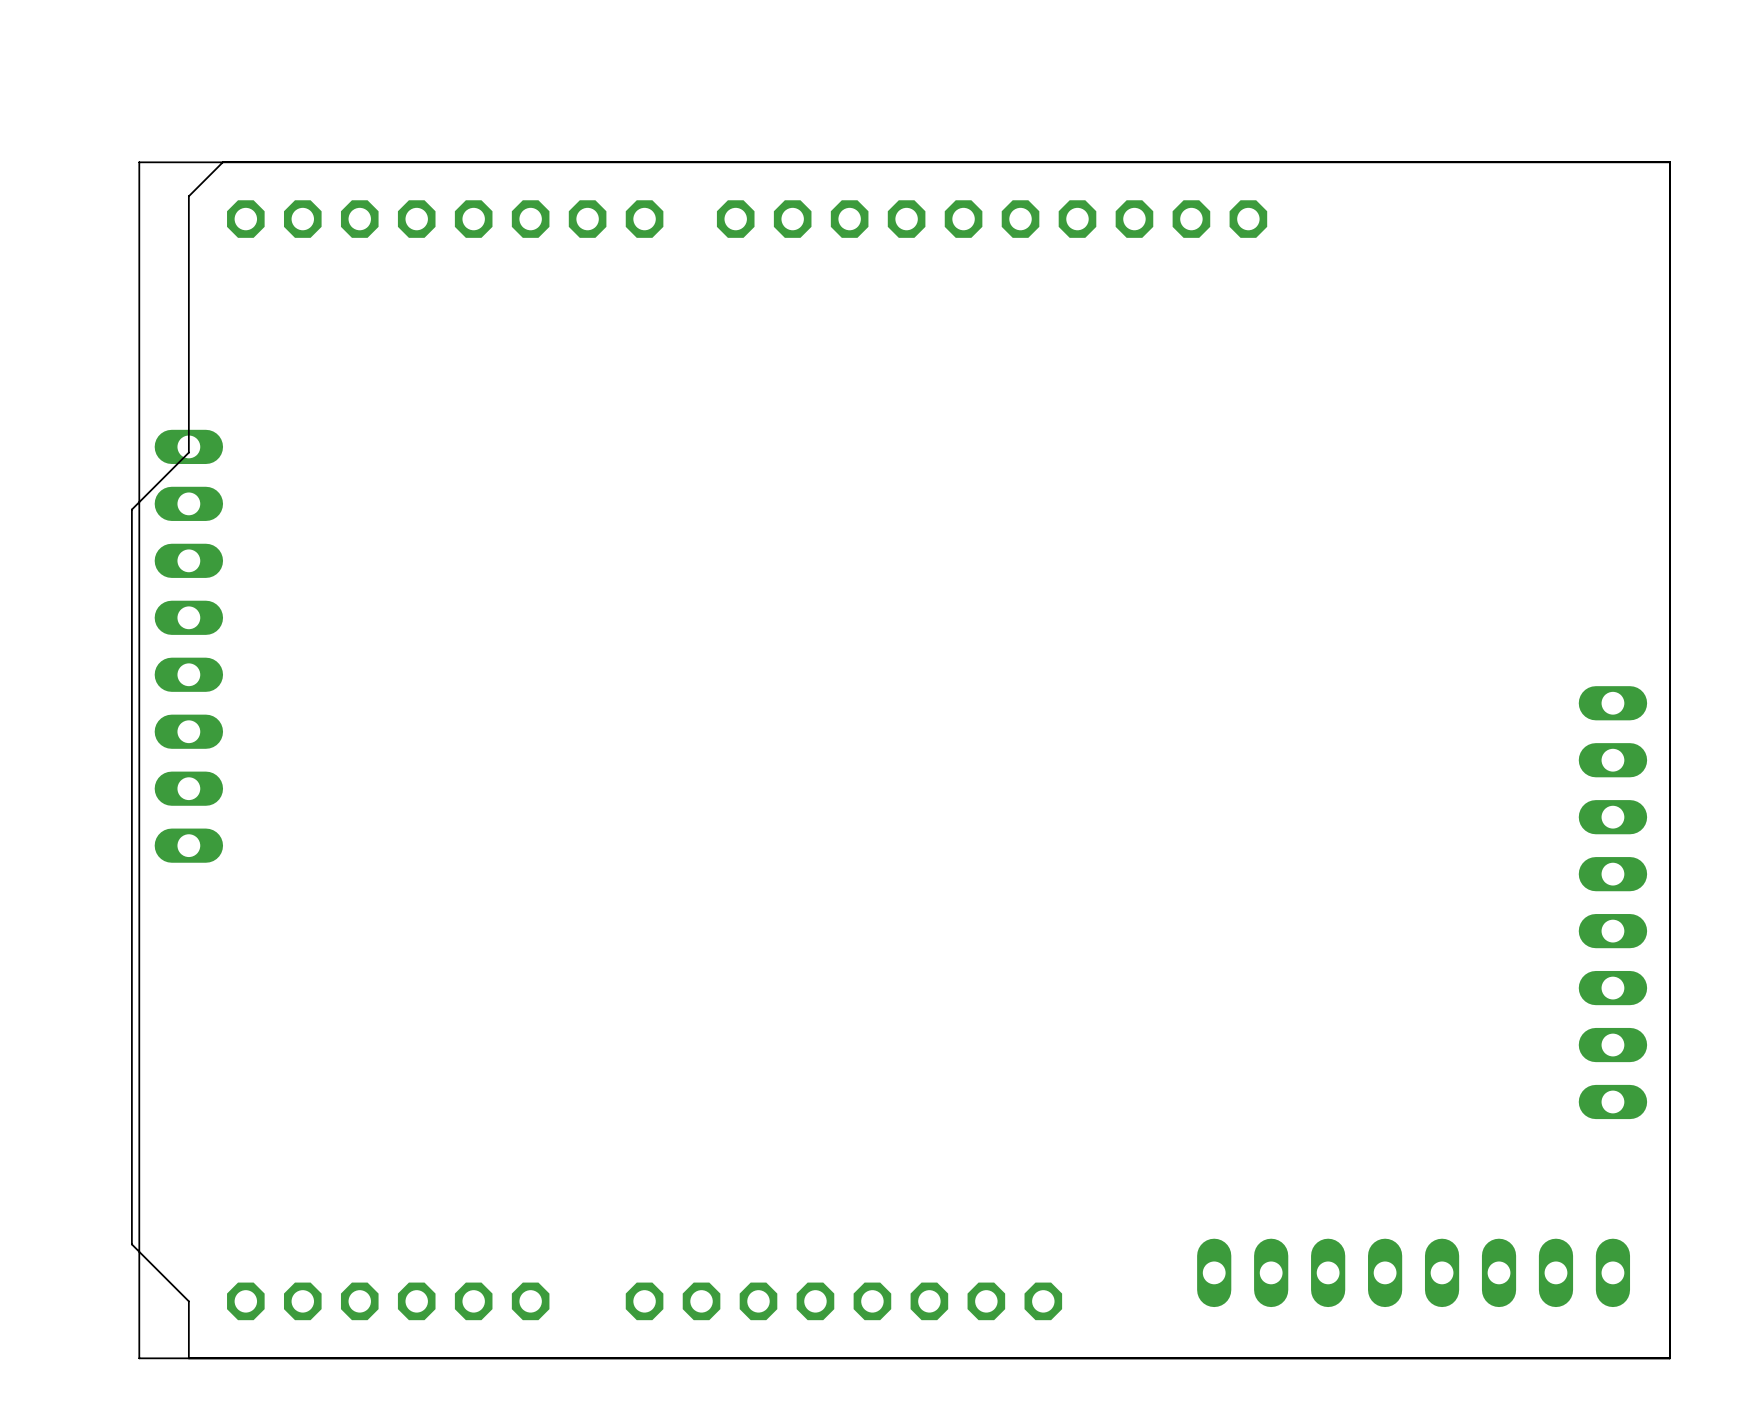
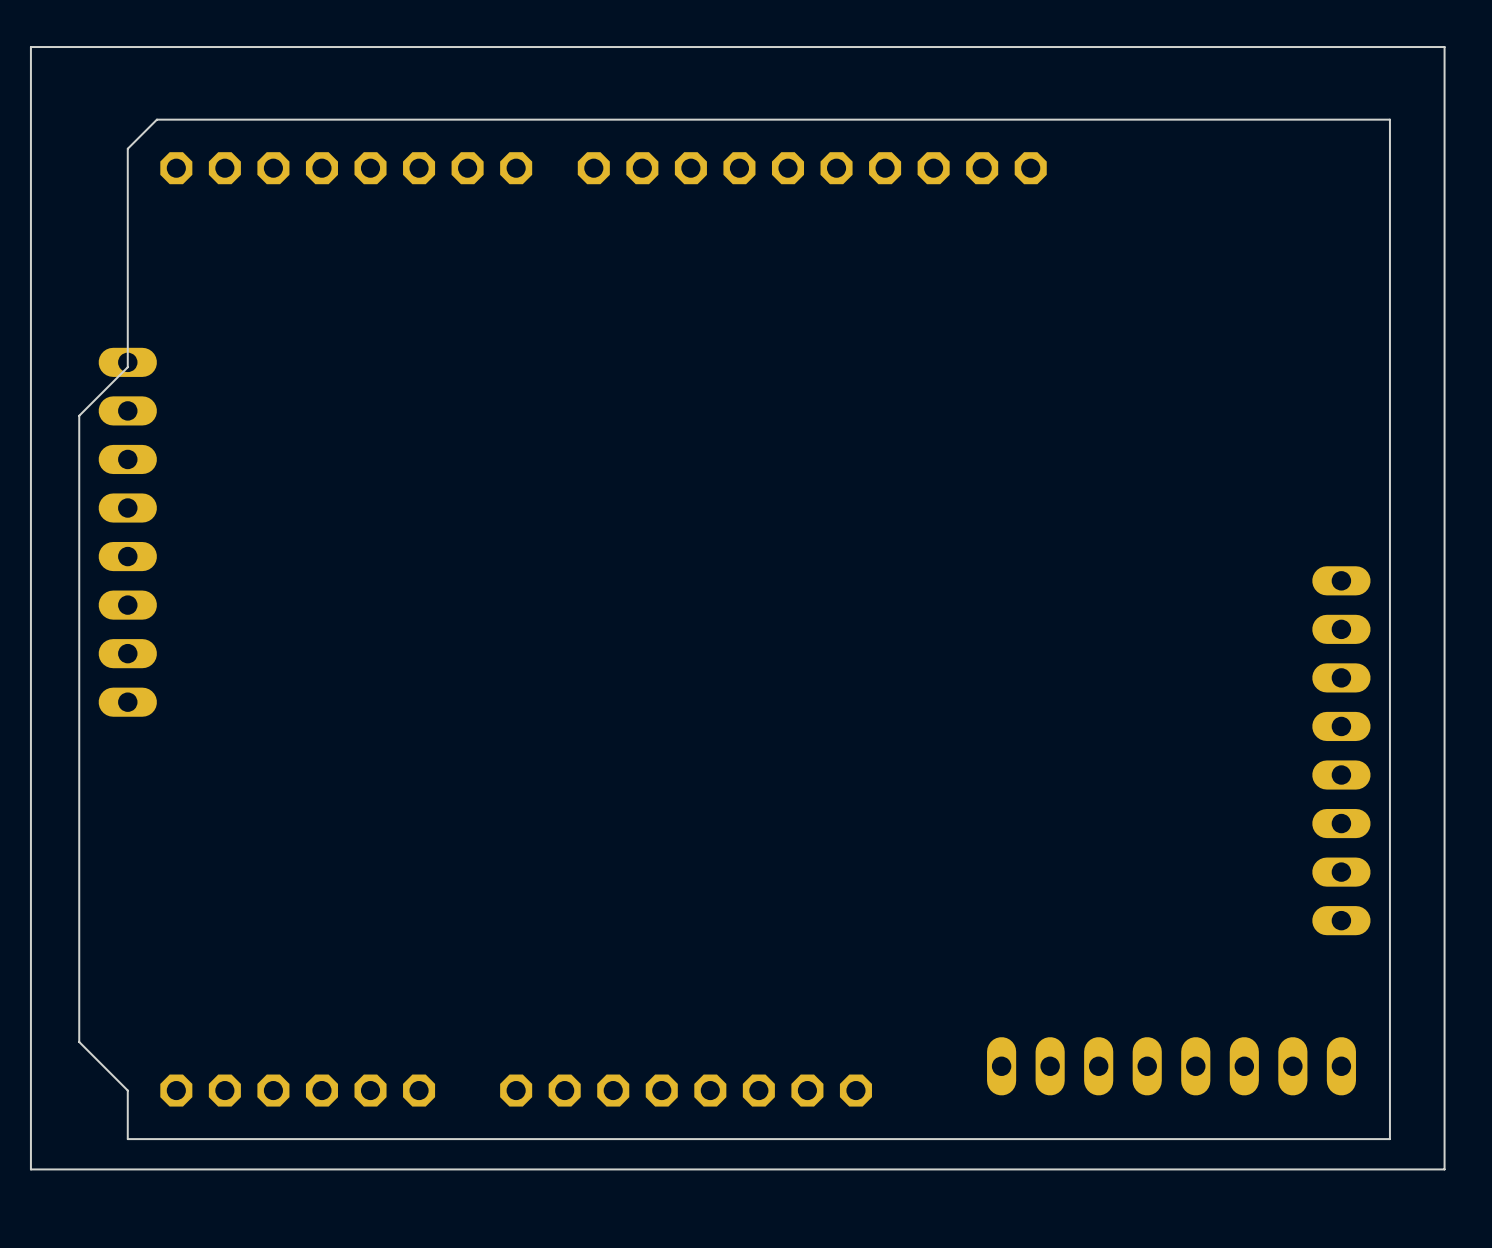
board edge: (1669, 162) (139, 162) (139, 1358) (1669, 1358) (1669, 162) -> (1444, 47) (1444, 1169) (30, 1169) (30, 47) (1444, 47)

